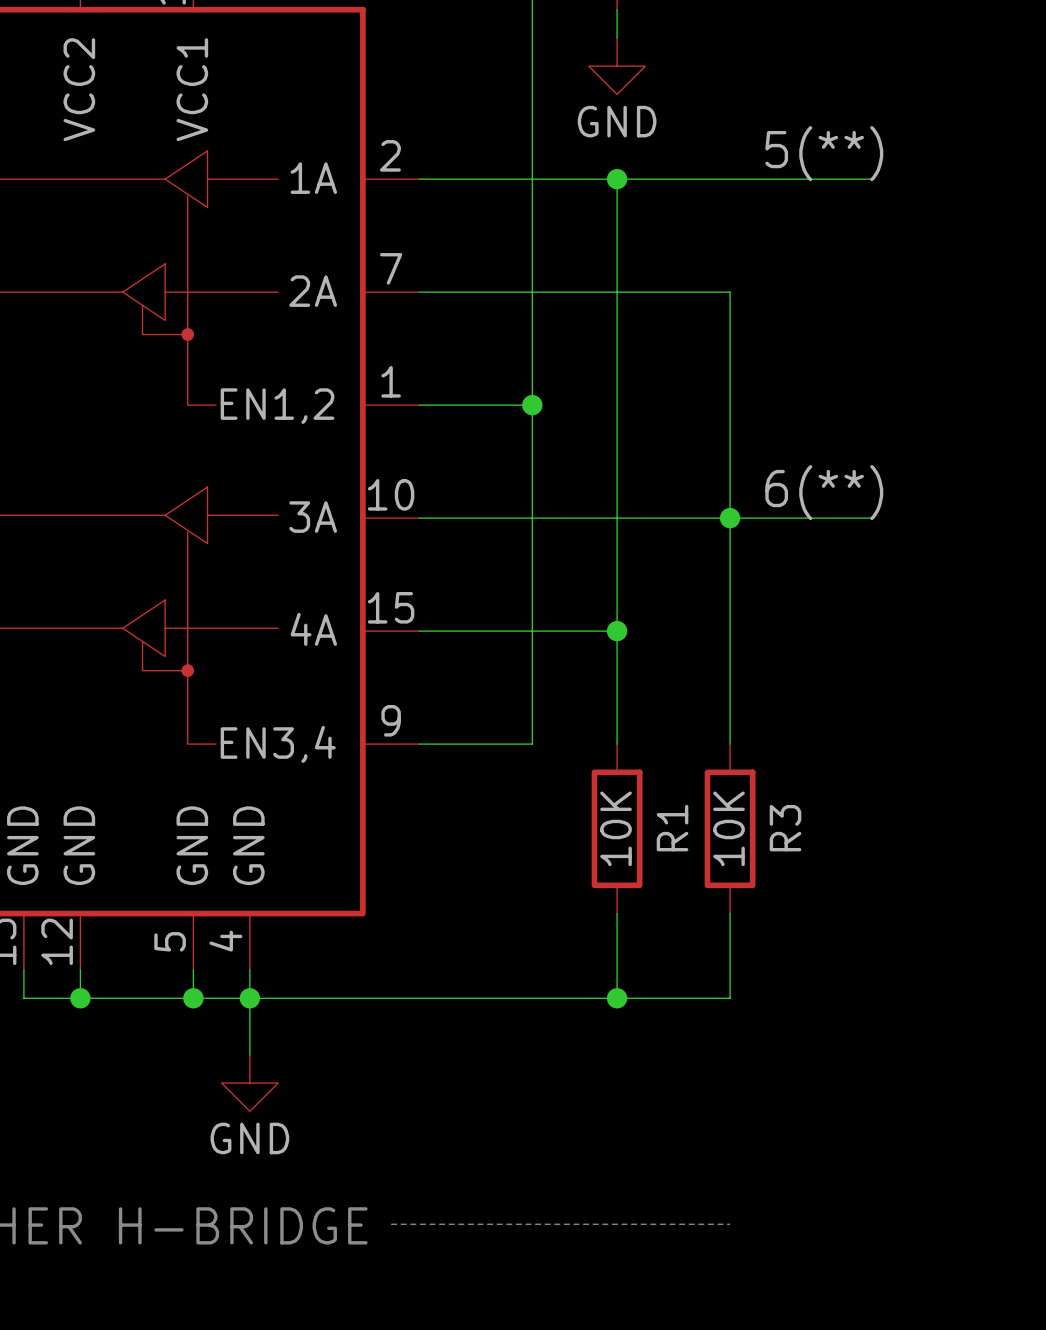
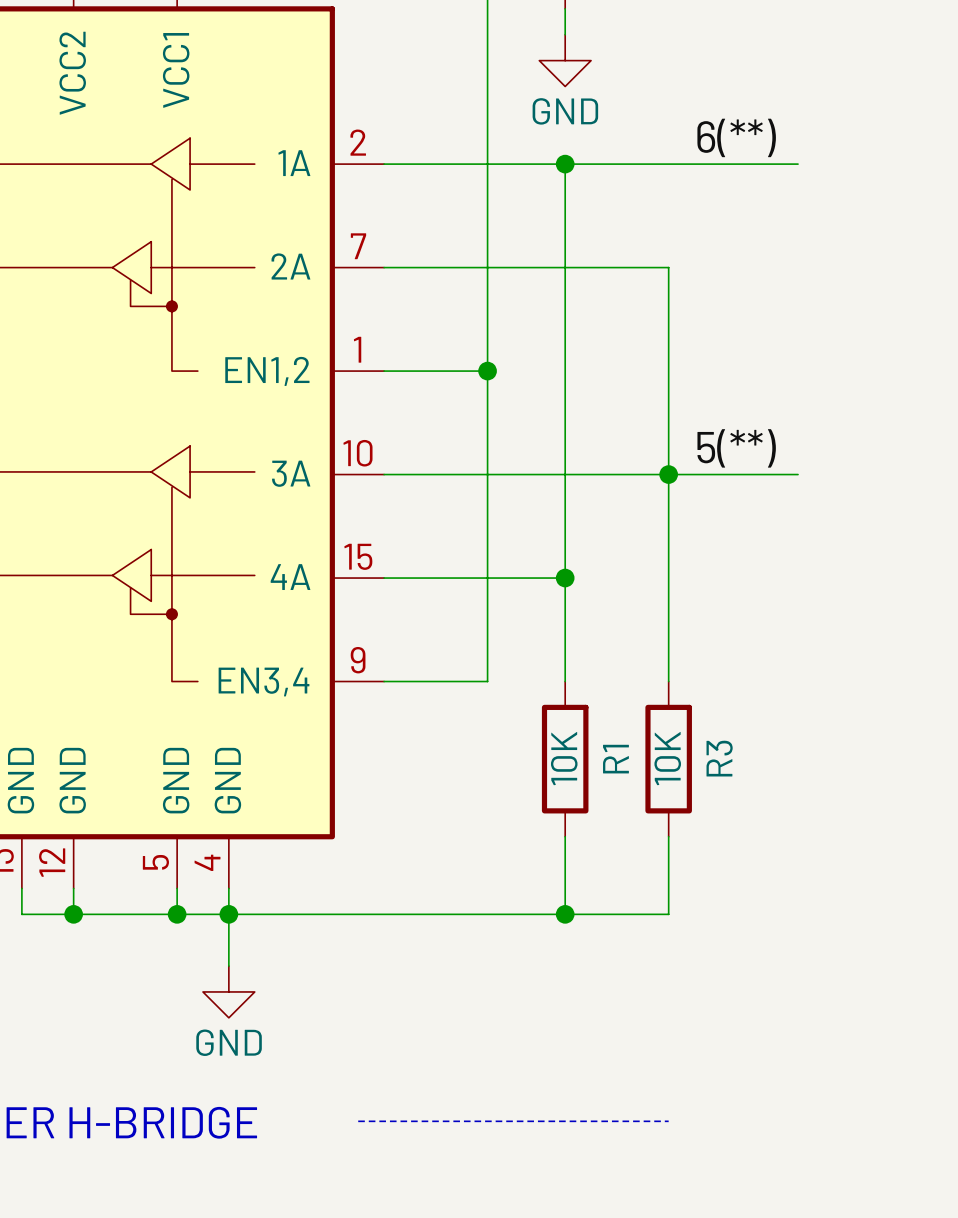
label: 5(**) (824, 153) -> 6(**) (736, 137)
label: 6(**) (824, 492) -> 5(**) (736, 448)

